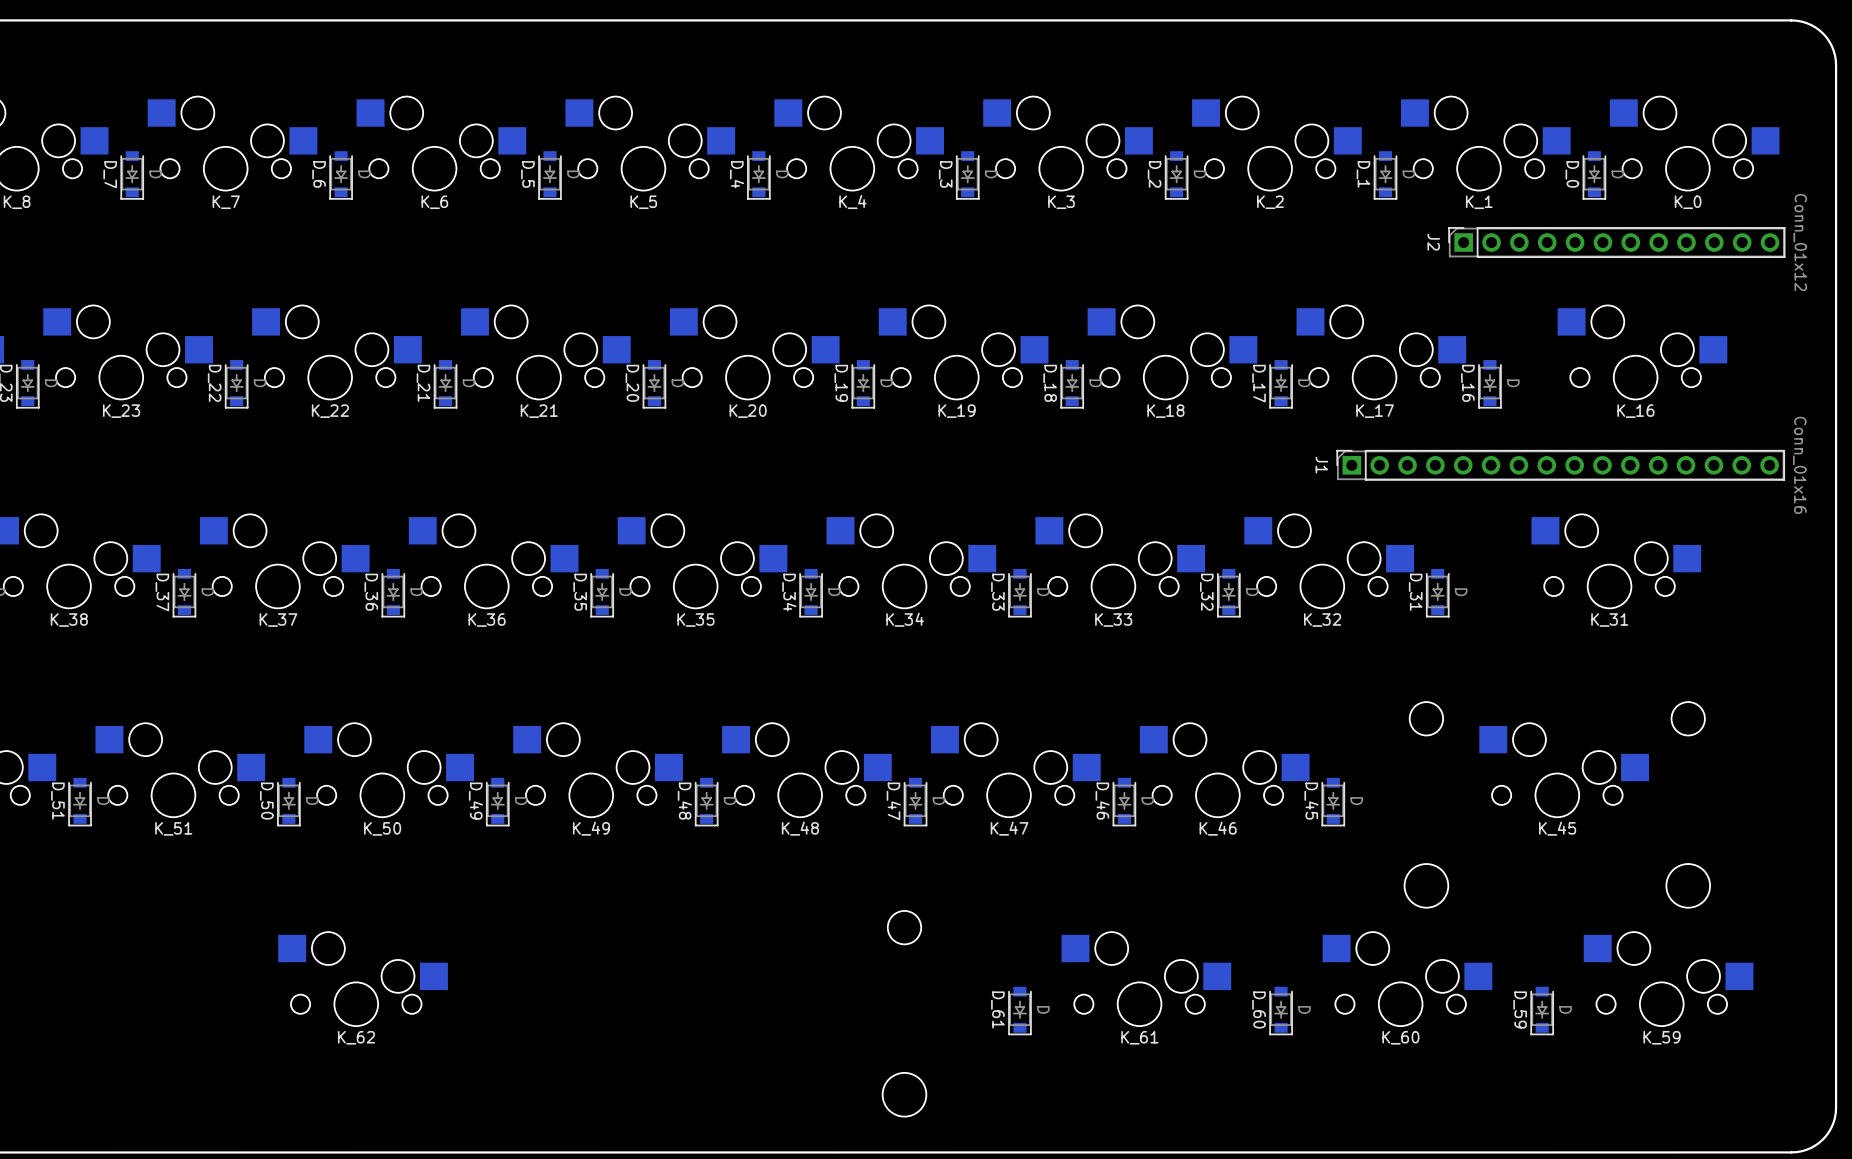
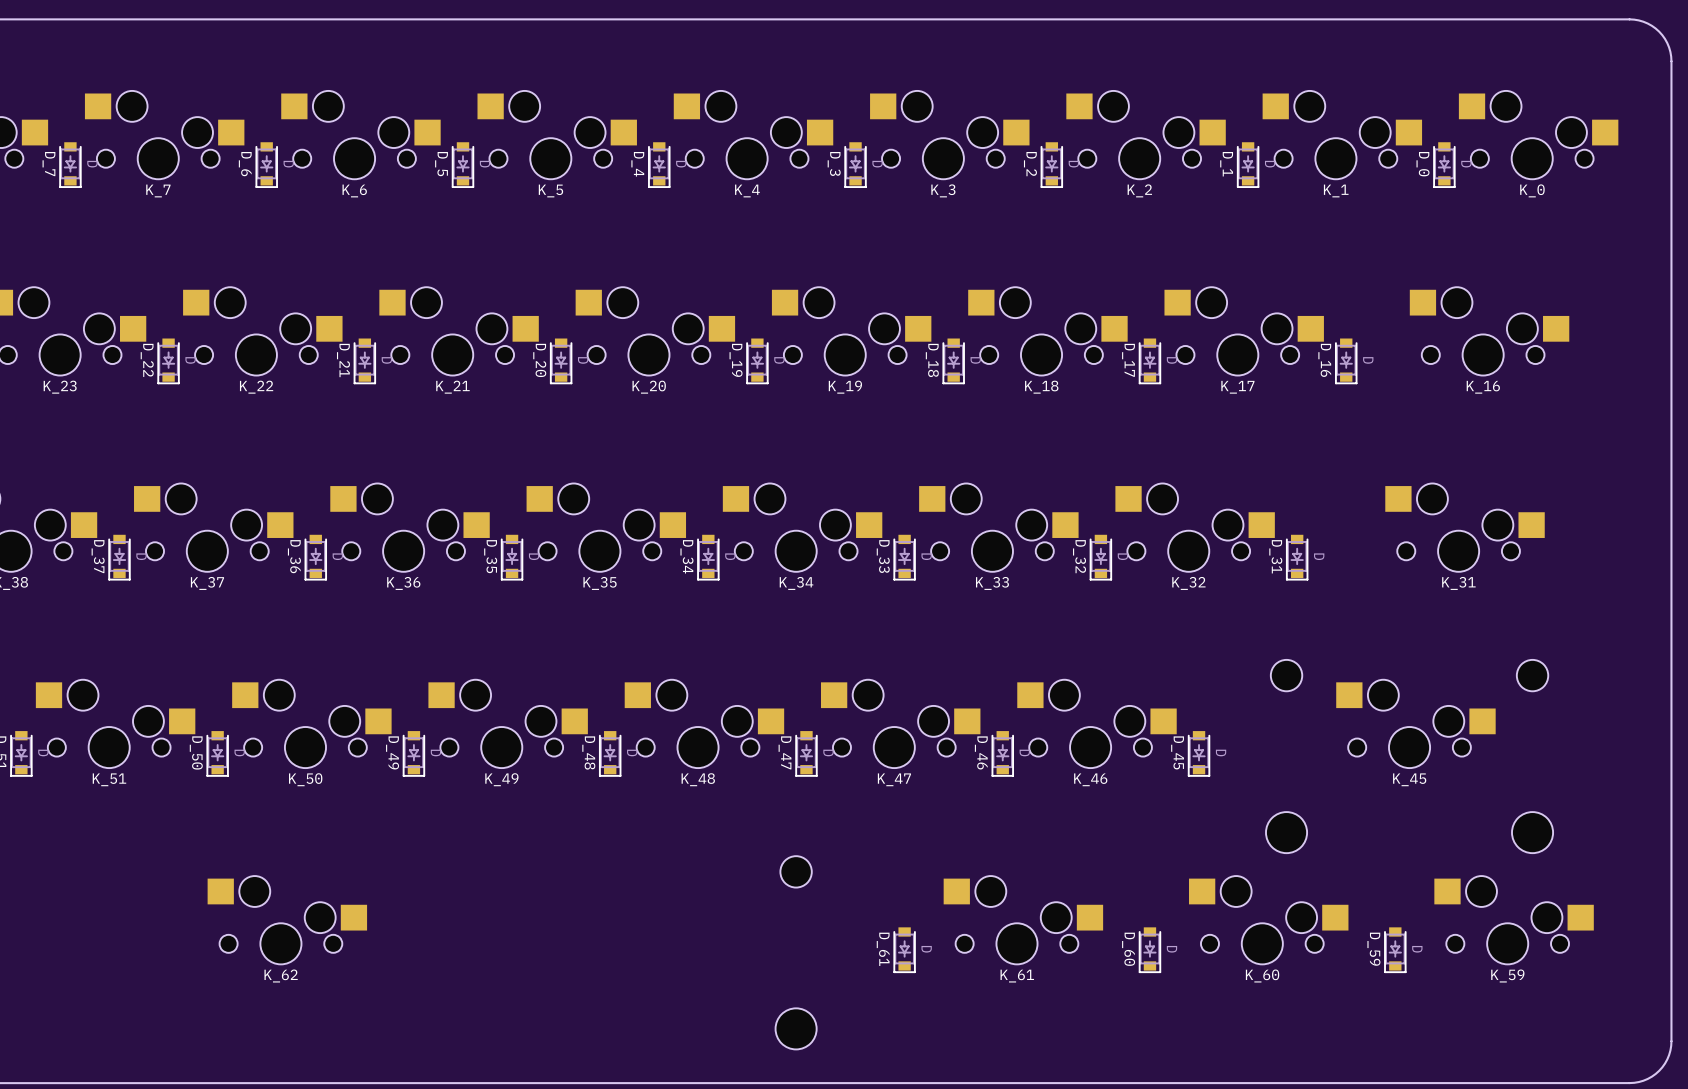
J2: Conn_01x12 (1616, 242) -> none
J1: Conn_01x16 (1560, 465) -> none

